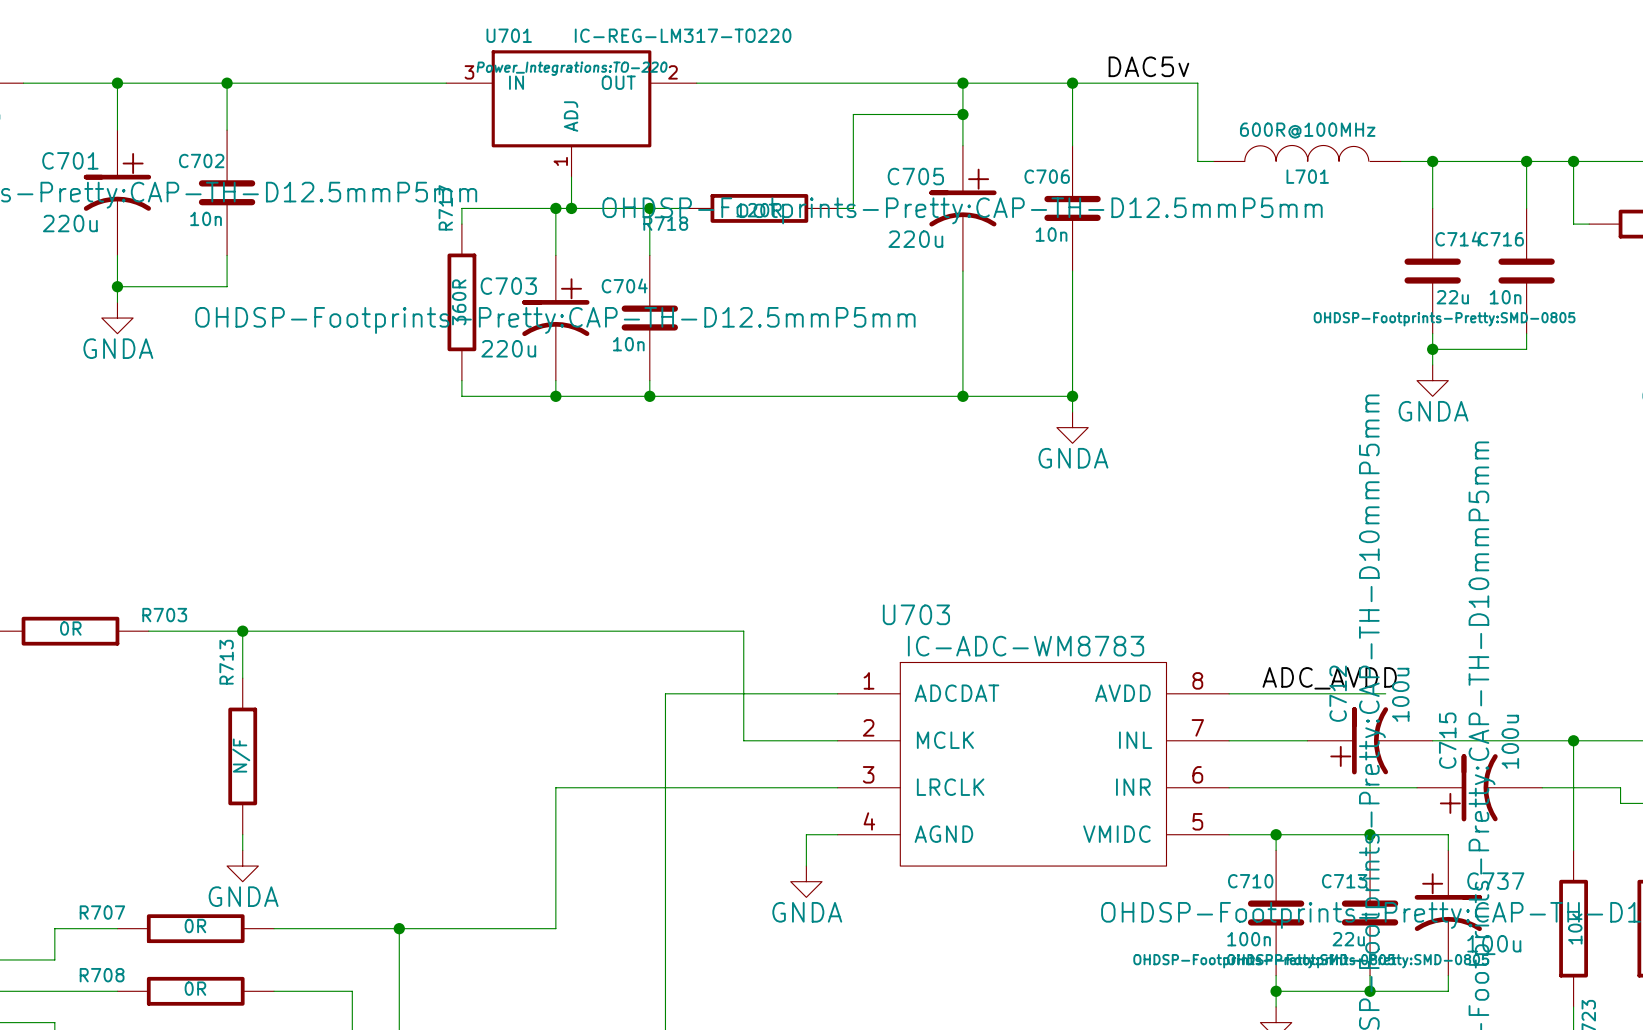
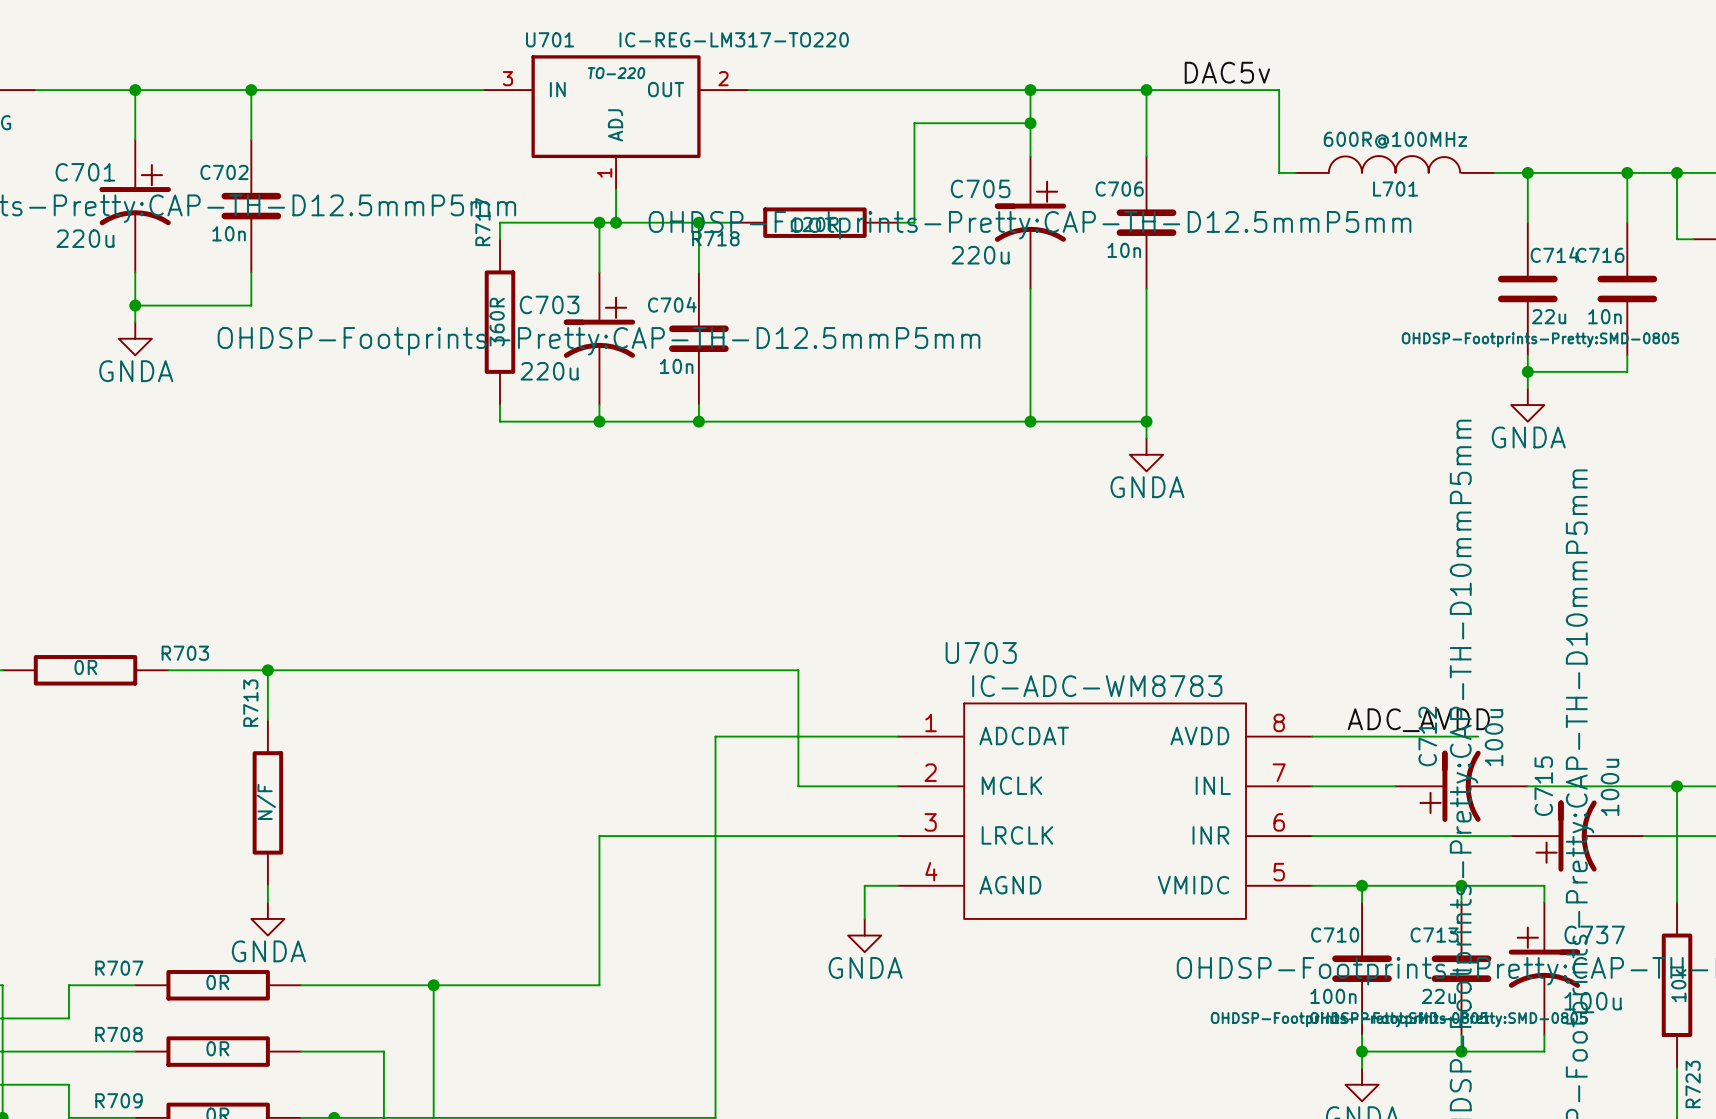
U701 text: Power_Integrations:TO-220 (572, 68) -> TO-220 (616, 73)

